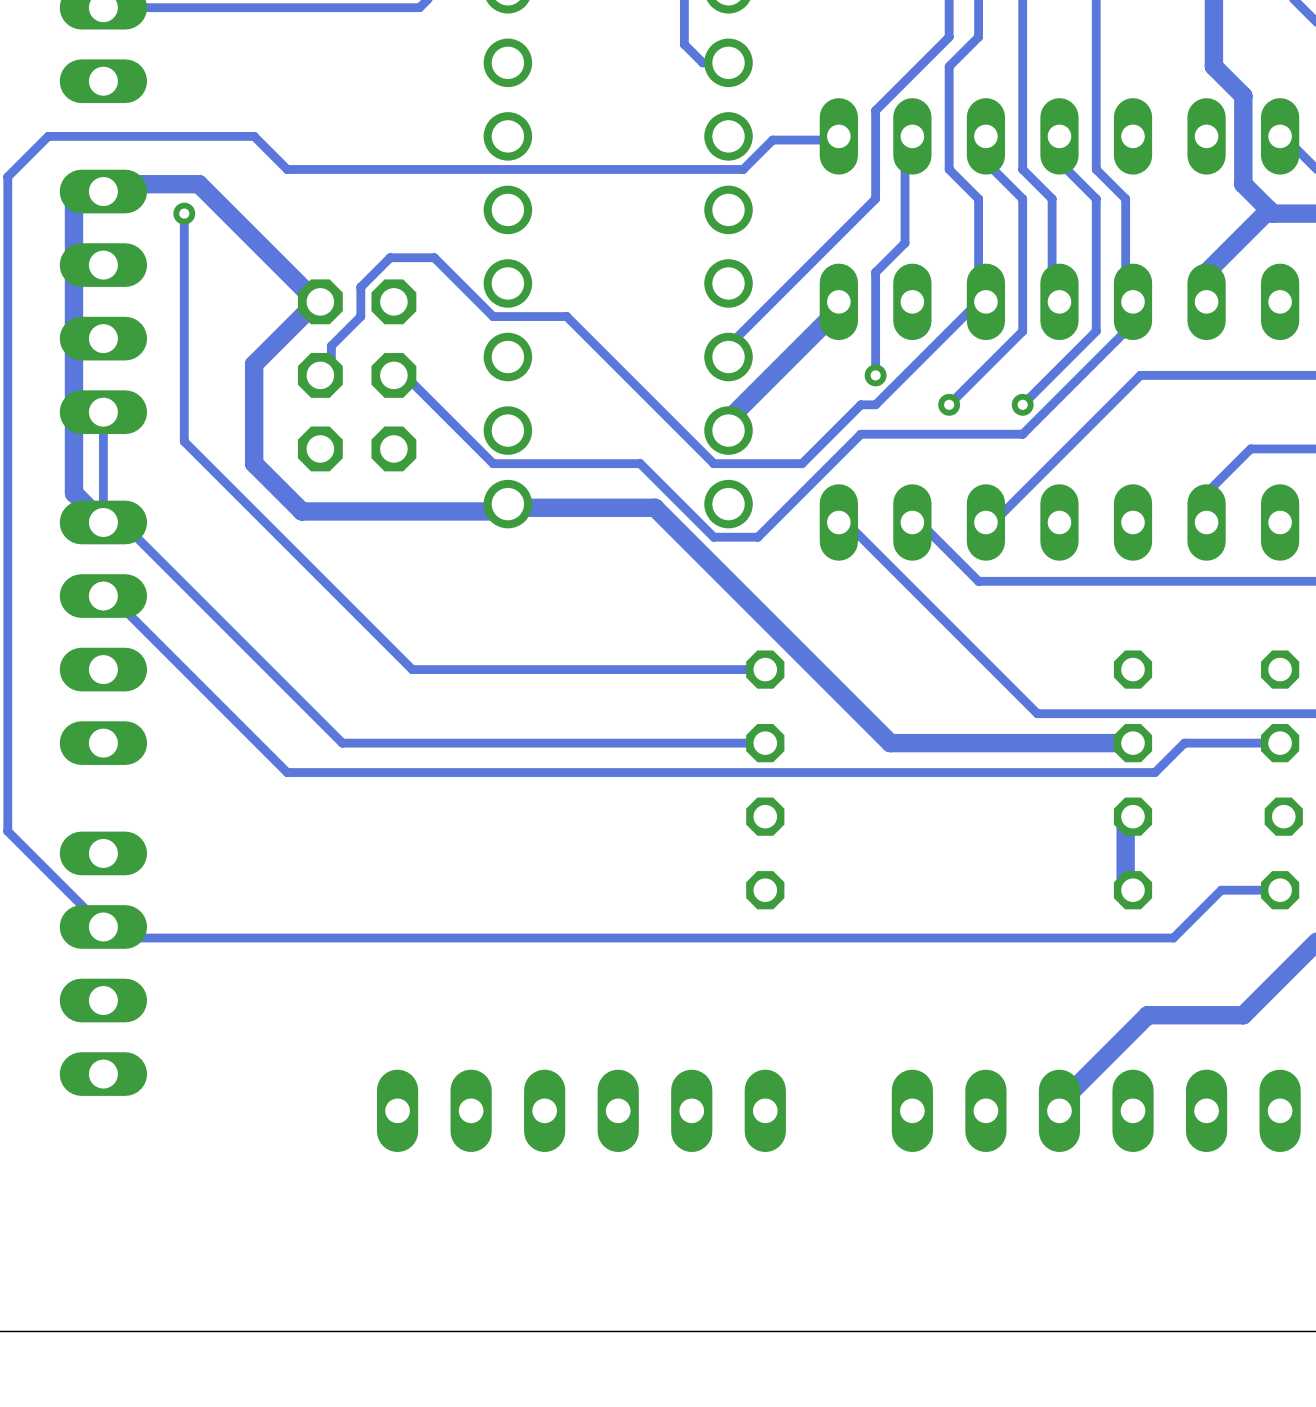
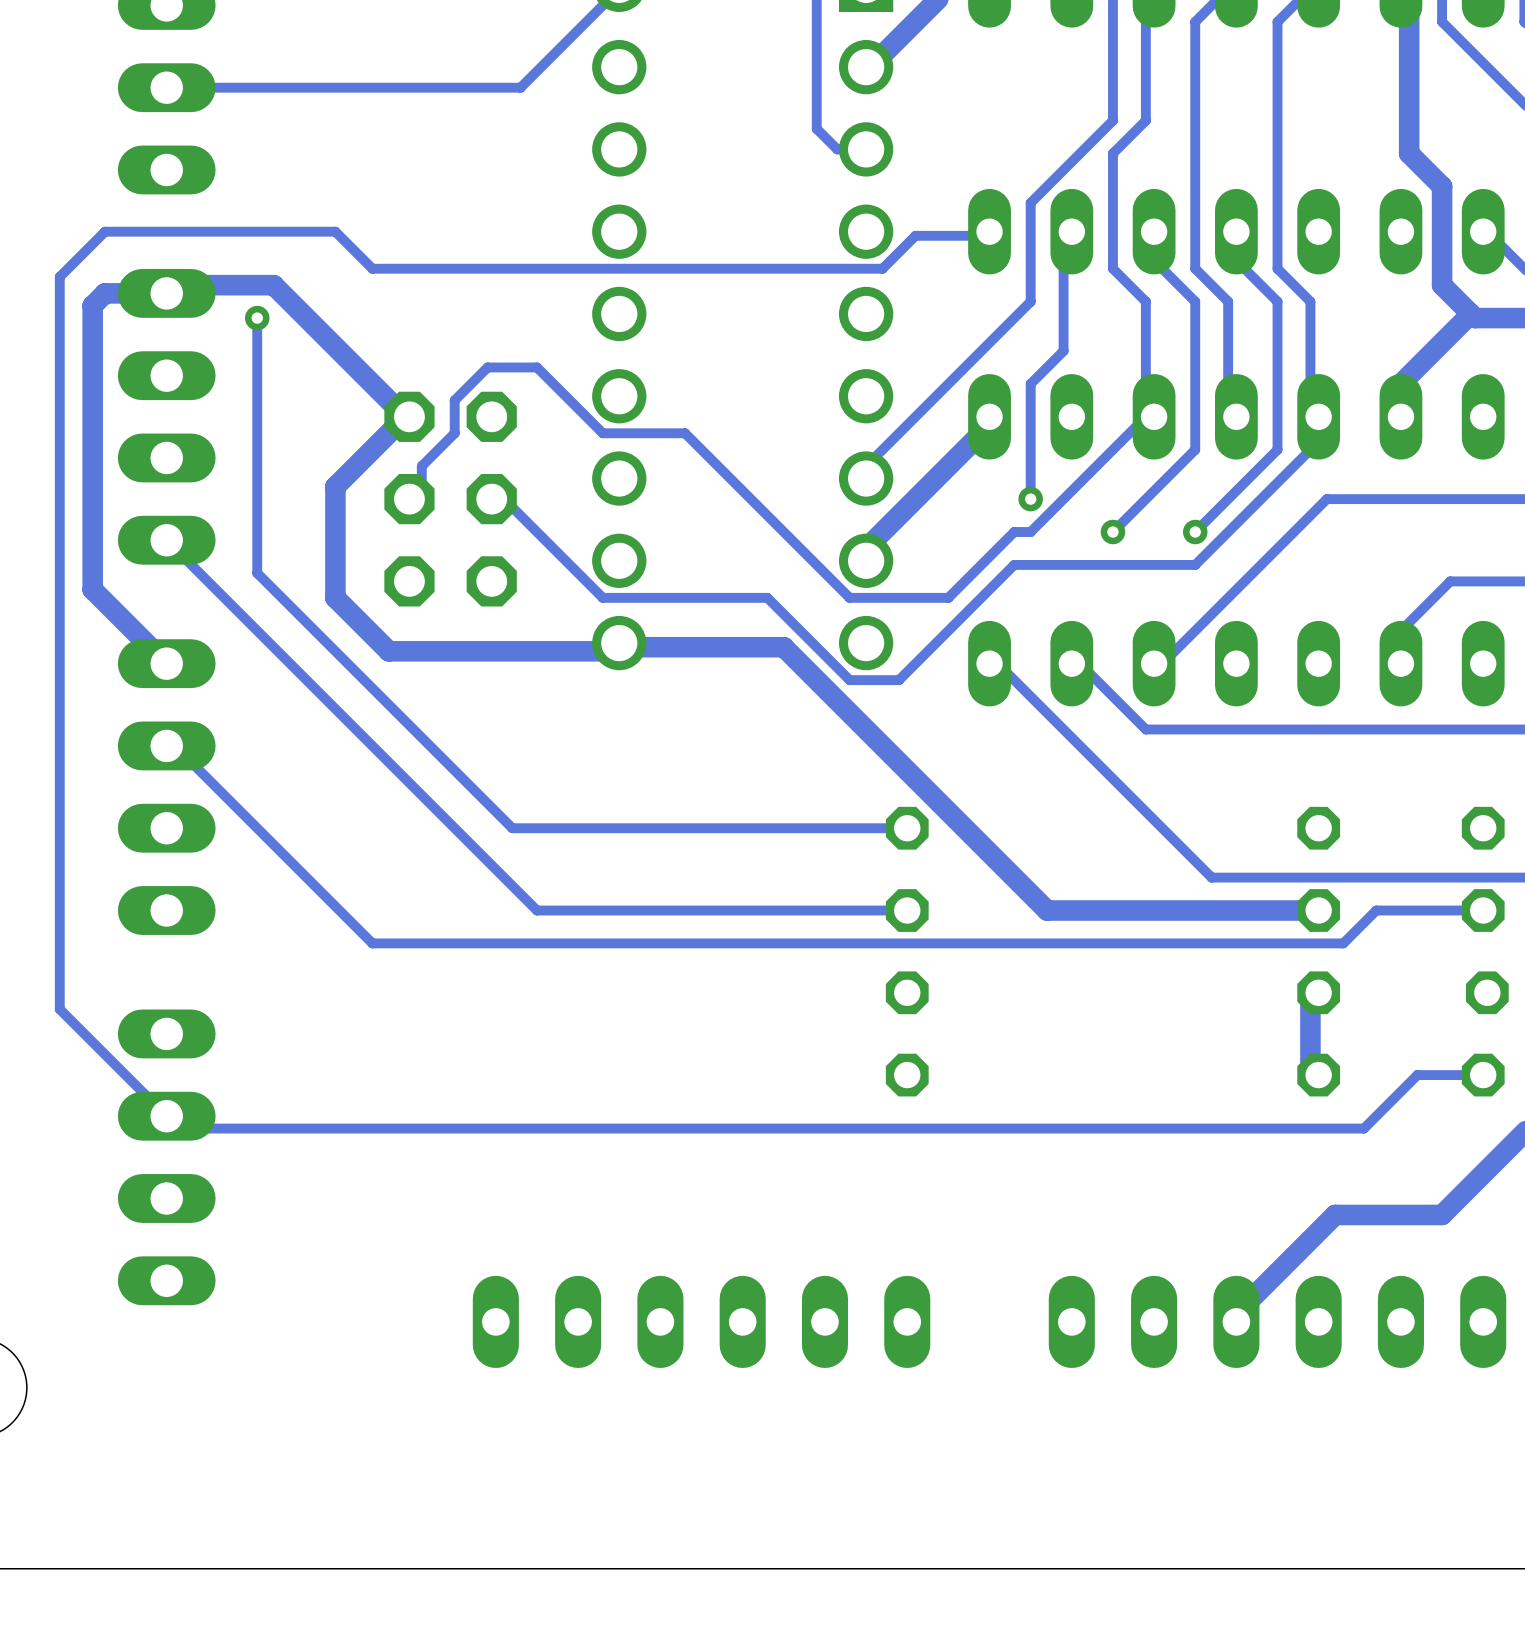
track: (73, 191) (73, 493) -> (133, 293) (105, 293) (92, 305) (92, 589) (133, 630)
track: (103, 412) (103, 504) (342, 743) (434, 743) -> (166, 540) (536, 910)

